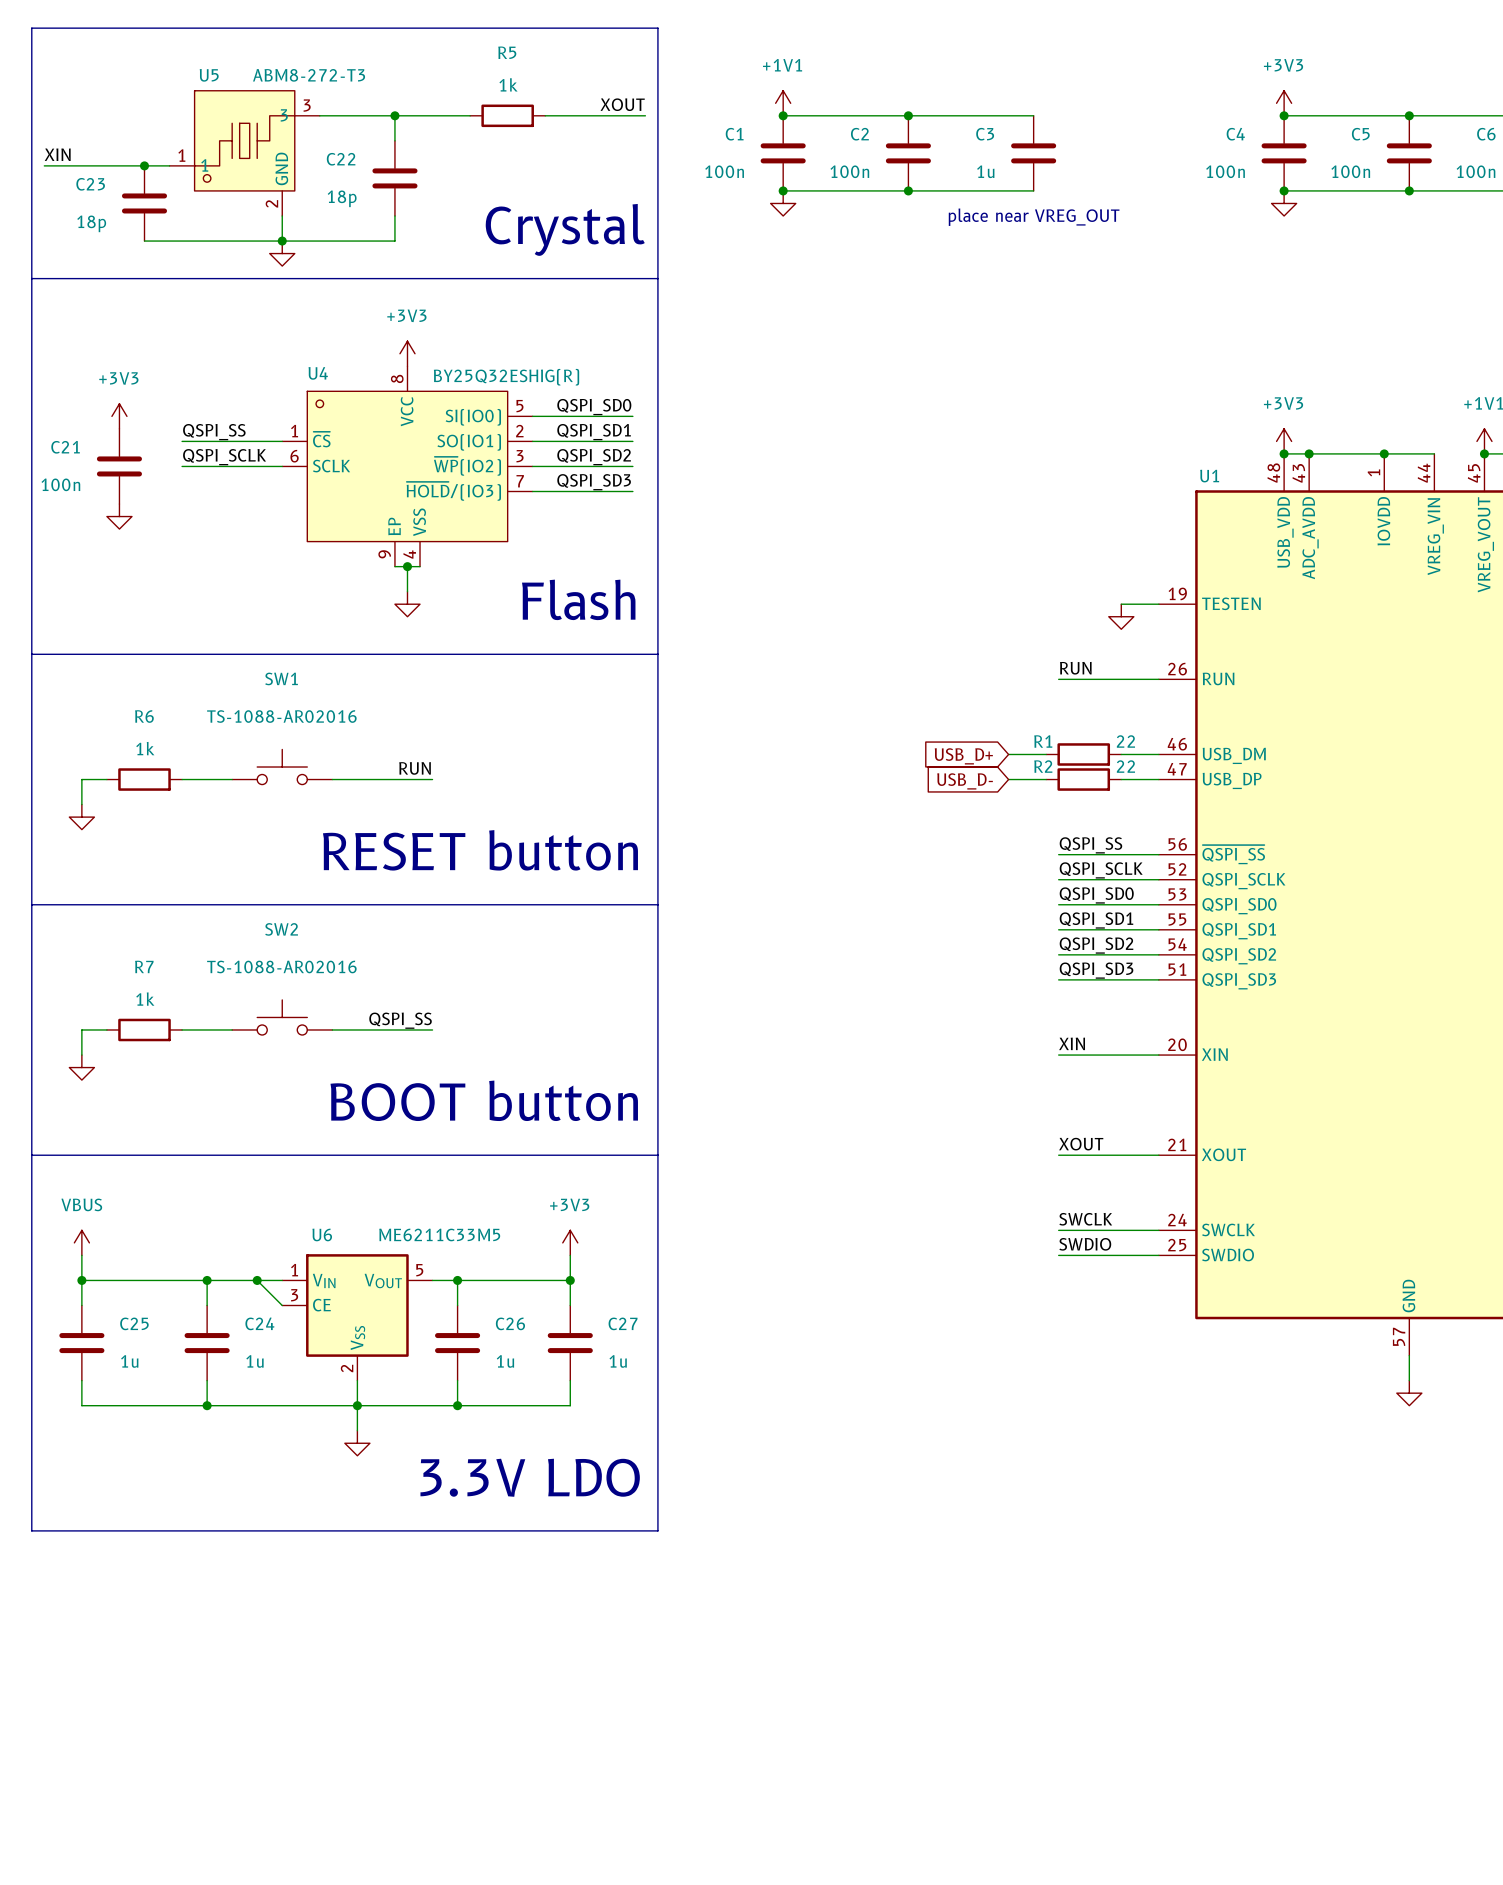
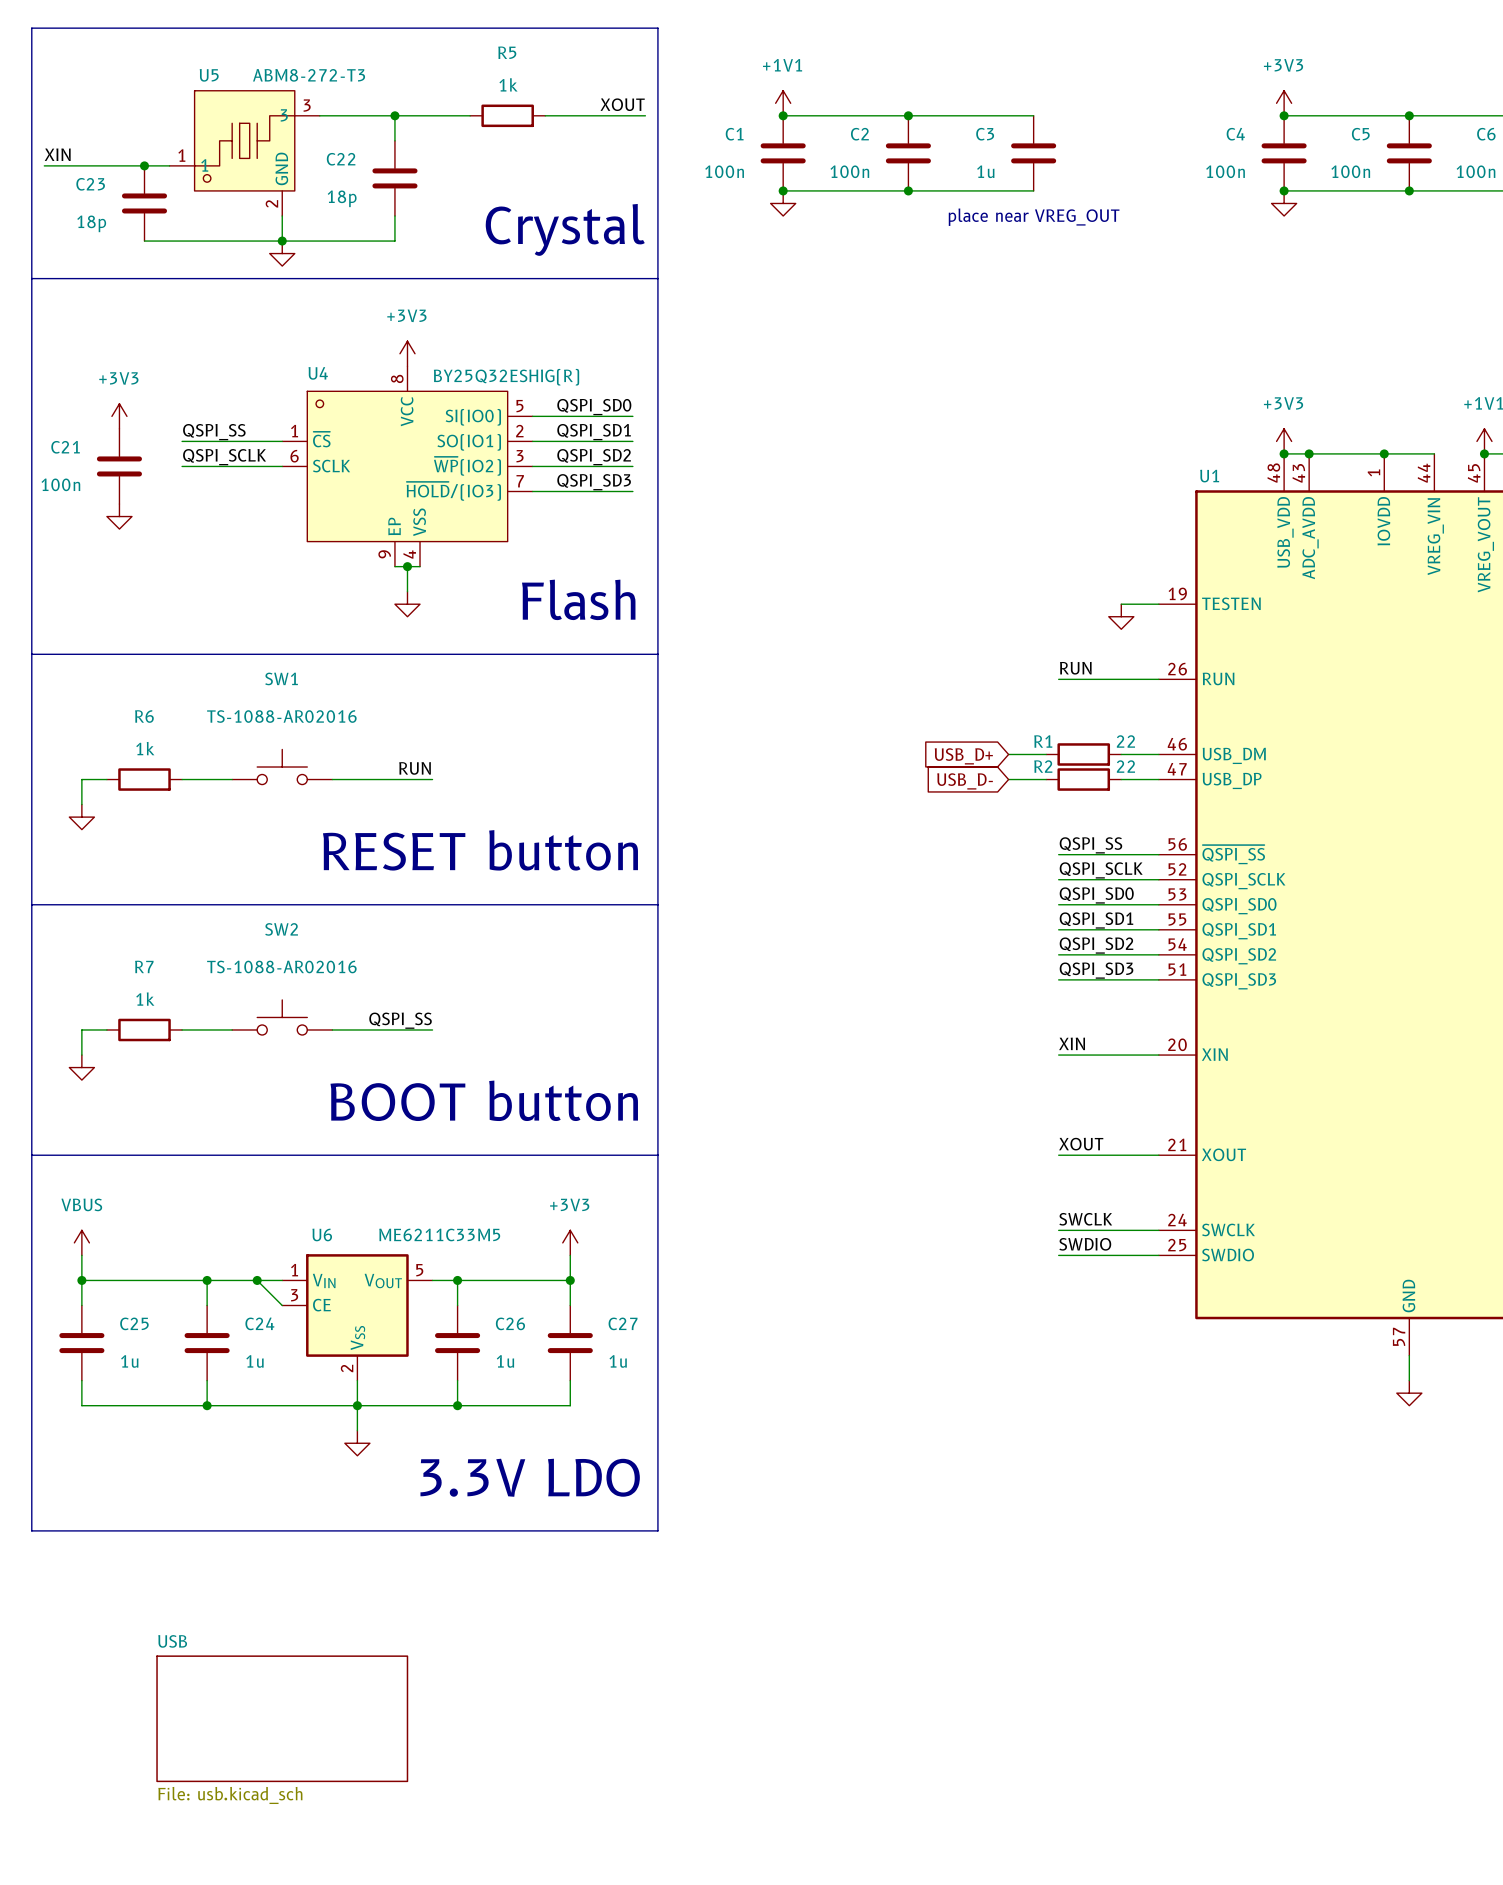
sheet USB: none -> File: usb.kicad_sch (282, 1718)

